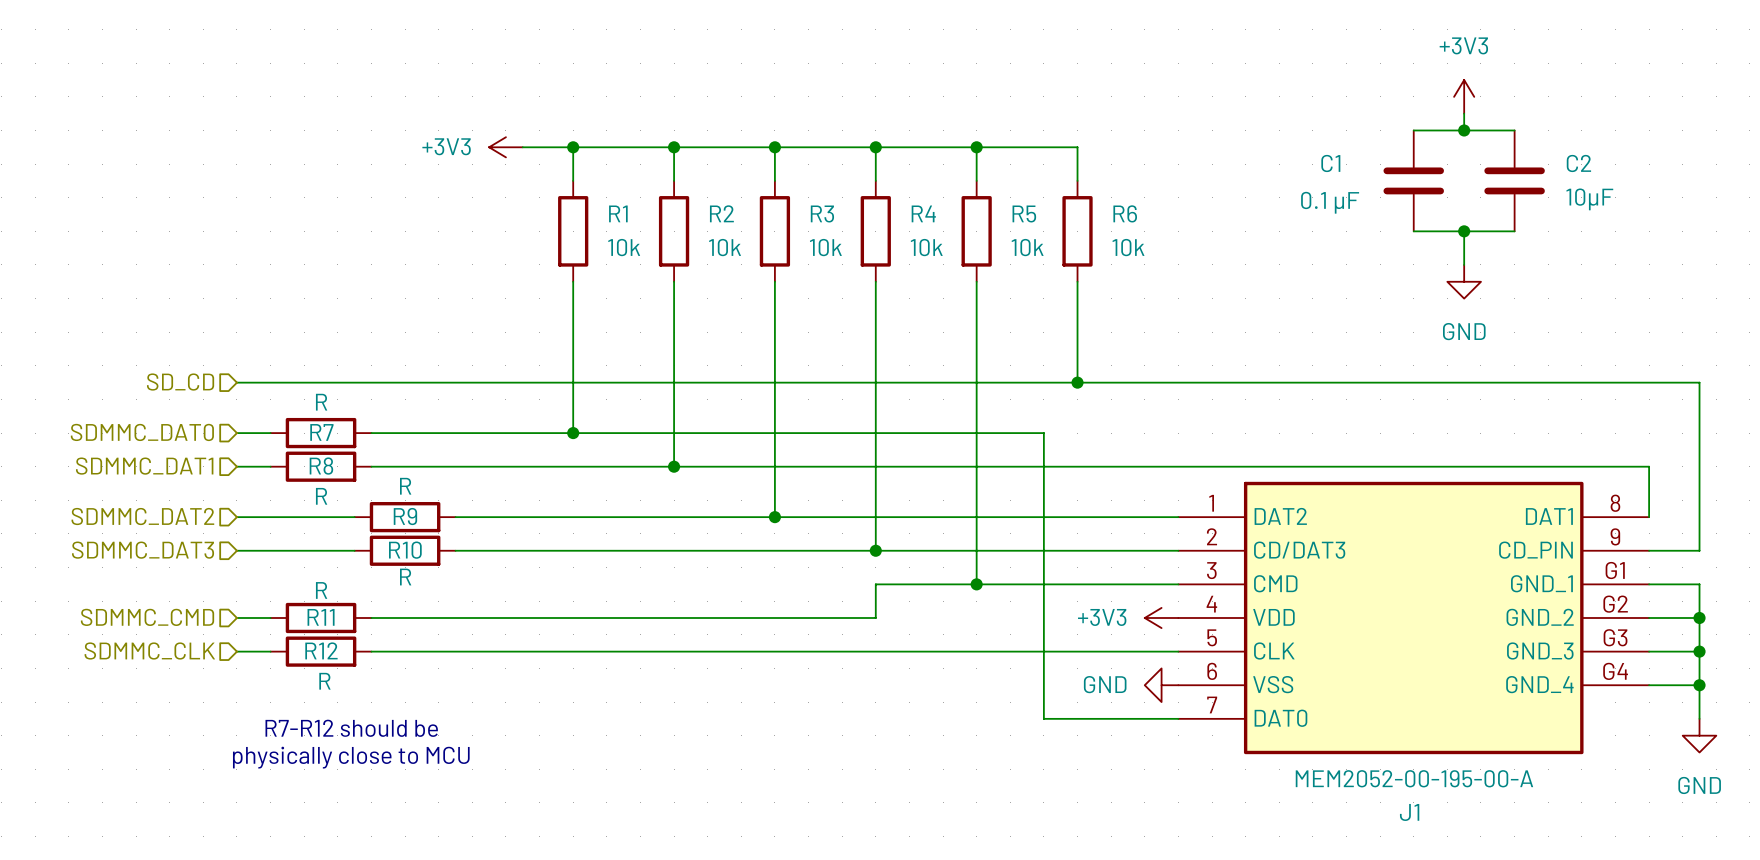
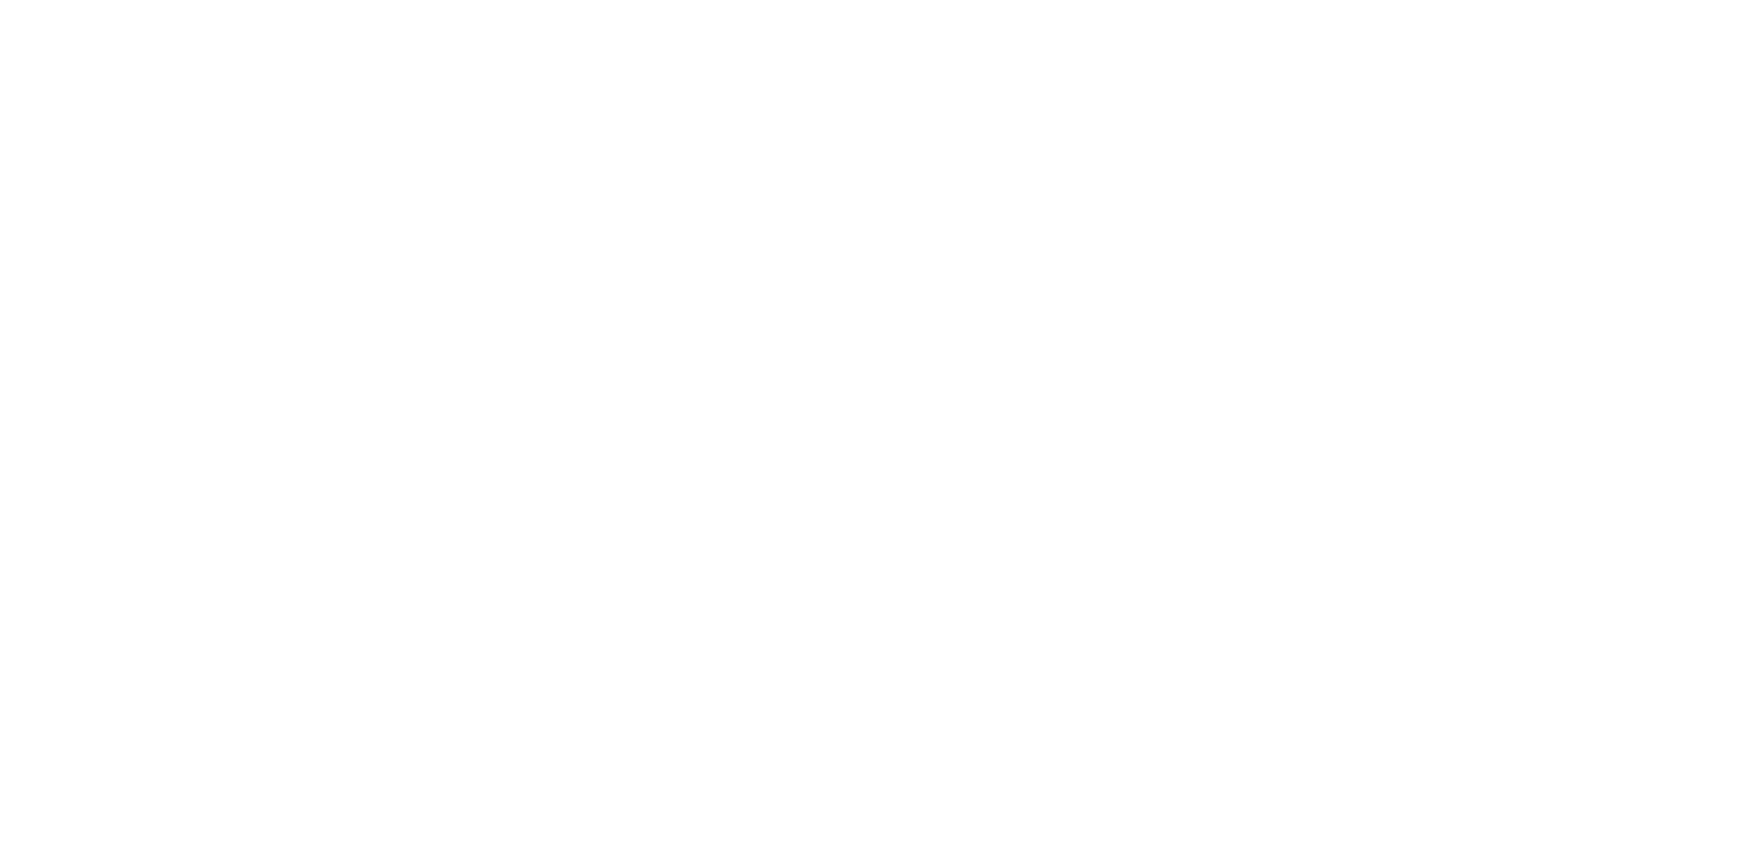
power symbol: +3V3 (1464, 96) -> none
wire: (1464, 113) (1464, 130) -> none
wire: (1413, 130) (1514, 130) -> none
junction: (1464, 130) -> none
power symbol: +3V3 (505, 147) -> none
wire: (522, 147) (1077, 147) (1077, 180) -> none
wire: (573, 147) (573, 180) -> none
junction: (573, 147) -> none
wire: (674, 147) (674, 180) -> none
junction: (674, 147) -> none
wire: (774, 147) (774, 180) -> none
junction: (774, 147) -> none
wire: (875, 147) (875, 180) -> none
junction: (875, 147) -> none
wire: (976, 147) (976, 180) -> none
junction: (976, 147) -> none
C1: 0.1 µF (1413, 180) -> none
C2: 10µF (1514, 180) -> none
R1: 10k (573, 231) -> none
R2: 10k (674, 231) -> none
R3: 10k (774, 231) -> none
R4: 10k (875, 231) -> none
R5: 10k (976, 231) -> none
R6: 10k (1077, 231) -> none
wire: (1413, 231) (1514, 231) -> none
wire: (1464, 231) (1464, 264) -> none
junction: (1464, 231) -> none
wire: (573, 281) (573, 433) -> none
wire: (674, 281) (674, 466) -> none
wire: (774, 281) (774, 517) -> none
wire: (875, 281) (875, 550) -> none
wire: (976, 281) (976, 584) -> none
wire: (1077, 281) (1077, 382) -> none
power symbol: GND (1464, 281) -> none
hierarchical label: SD_CD (180, 382) -> none
wire: (236, 382) (1699, 382) (1699, 550) (1649, 550) -> none
junction: (1077, 382) -> none
hierarchical label: SDMMC_DAT0 (142, 432) -> none
wire: (236, 433) (270, 433) -> none
R7: R (321, 433) -> none
wire: (371, 433) (1043, 433) (1043, 718) (1178, 718) -> none
junction: (573, 433) -> none
hierarchical label: SDMMC_DAT1 (144, 466) -> none
wire: (236, 466) (270, 466) -> none
R8: R (321, 466) -> none
wire: (371, 466) (1649, 466) (1649, 517) -> none
junction: (674, 466) -> none
hierarchical label: SDMMC_DAT2 (142, 516) -> none
wire: (236, 517) (354, 517) -> none
R9: R (405, 517) -> none
wire: (455, 517) (1178, 517) -> none
junction: (774, 517) -> none
hierarchical label: SDMMC_DAT3 (143, 550) -> none
wire: (236, 550) (354, 550) -> none
R10: R (405, 550) -> none
wire: (455, 550) (1178, 550) -> none
junction: (875, 550) -> none
junction: (976, 584) -> none
wire: (1178, 584) (875, 584) (875, 618) (371, 618) -> none
wire: (1649, 584) (1699, 584) (1699, 718) -> none
hierarchical label: SDMMC_CMD (147, 617) -> none
wire: (236, 618) (270, 618) -> none
R11: R (321, 618) -> none
power symbol: +3V3 (1161, 618) -> none
J1: MEM2052-00-195-00-A (1413, 618) -> none
wire: (1649, 618) (1699, 618) -> none
junction: (1699, 618) -> none
hierarchical label: SDMMC_CLK (149, 651) -> none
wire: (236, 651) (270, 651) -> none
R12: R (321, 651) -> none
wire: (371, 651) (1178, 651) -> none
wire: (1649, 651) (1699, 651) -> none
junction: (1699, 651) -> none
power symbol: GND (1161, 685) -> none
wire: (1649, 685) (1699, 685) -> none
junction: (1699, 685) -> none
text: R7-R12 should be (351, 728) -> none
power symbol: GND (1699, 735) -> none
text: physically close to MCU (351, 757) -> none

